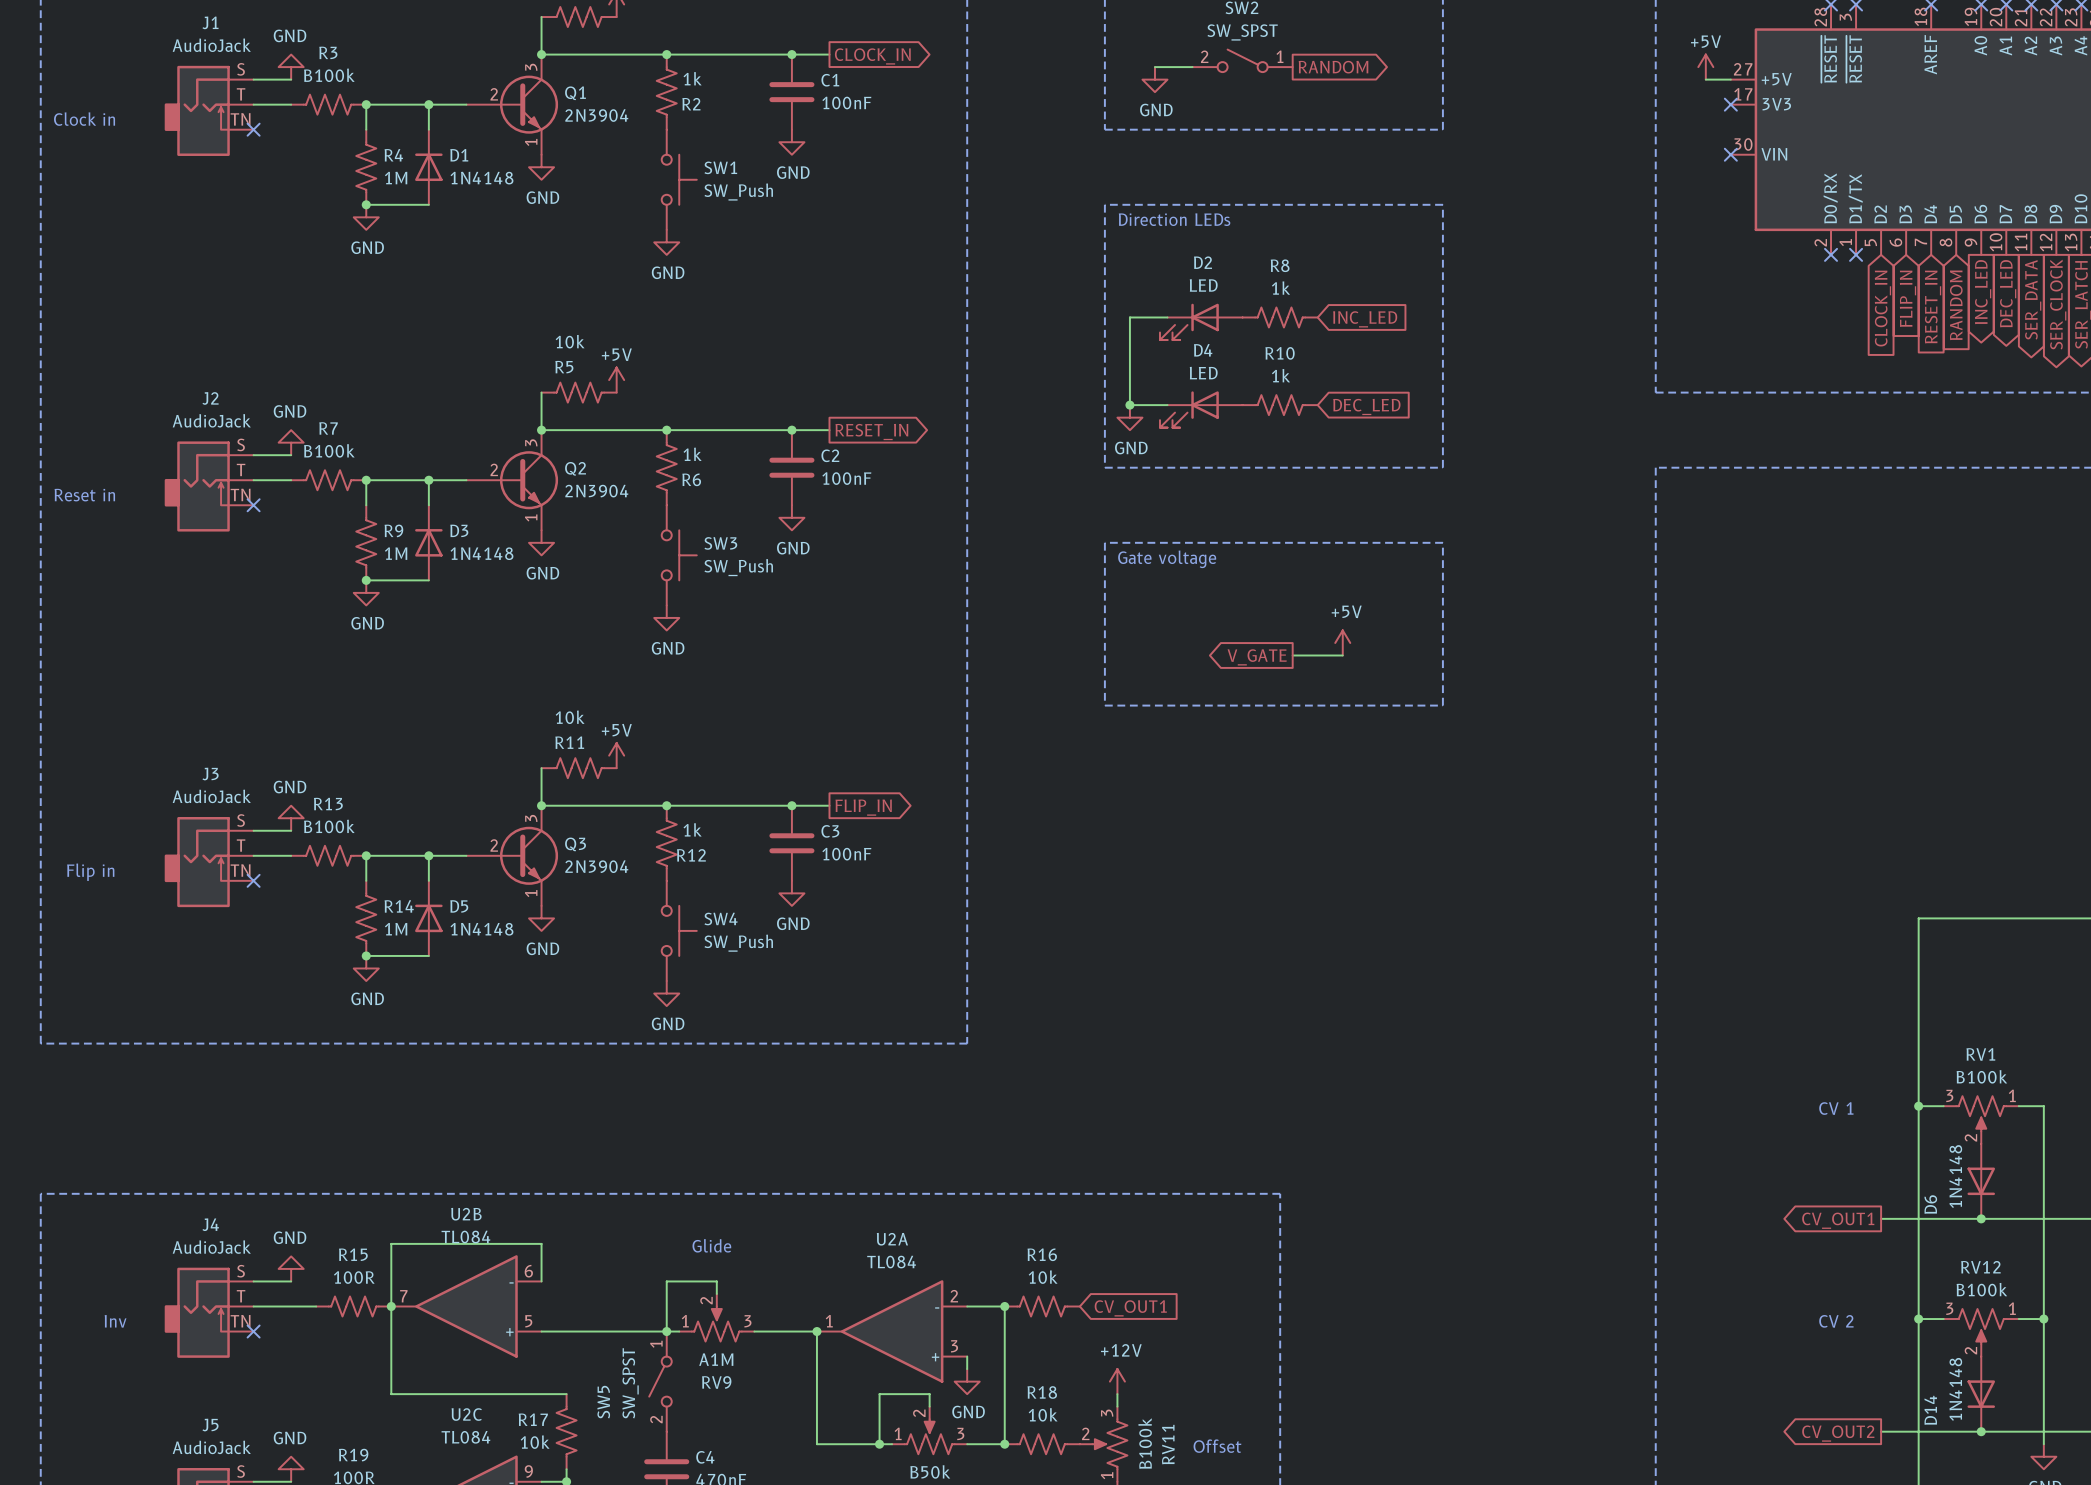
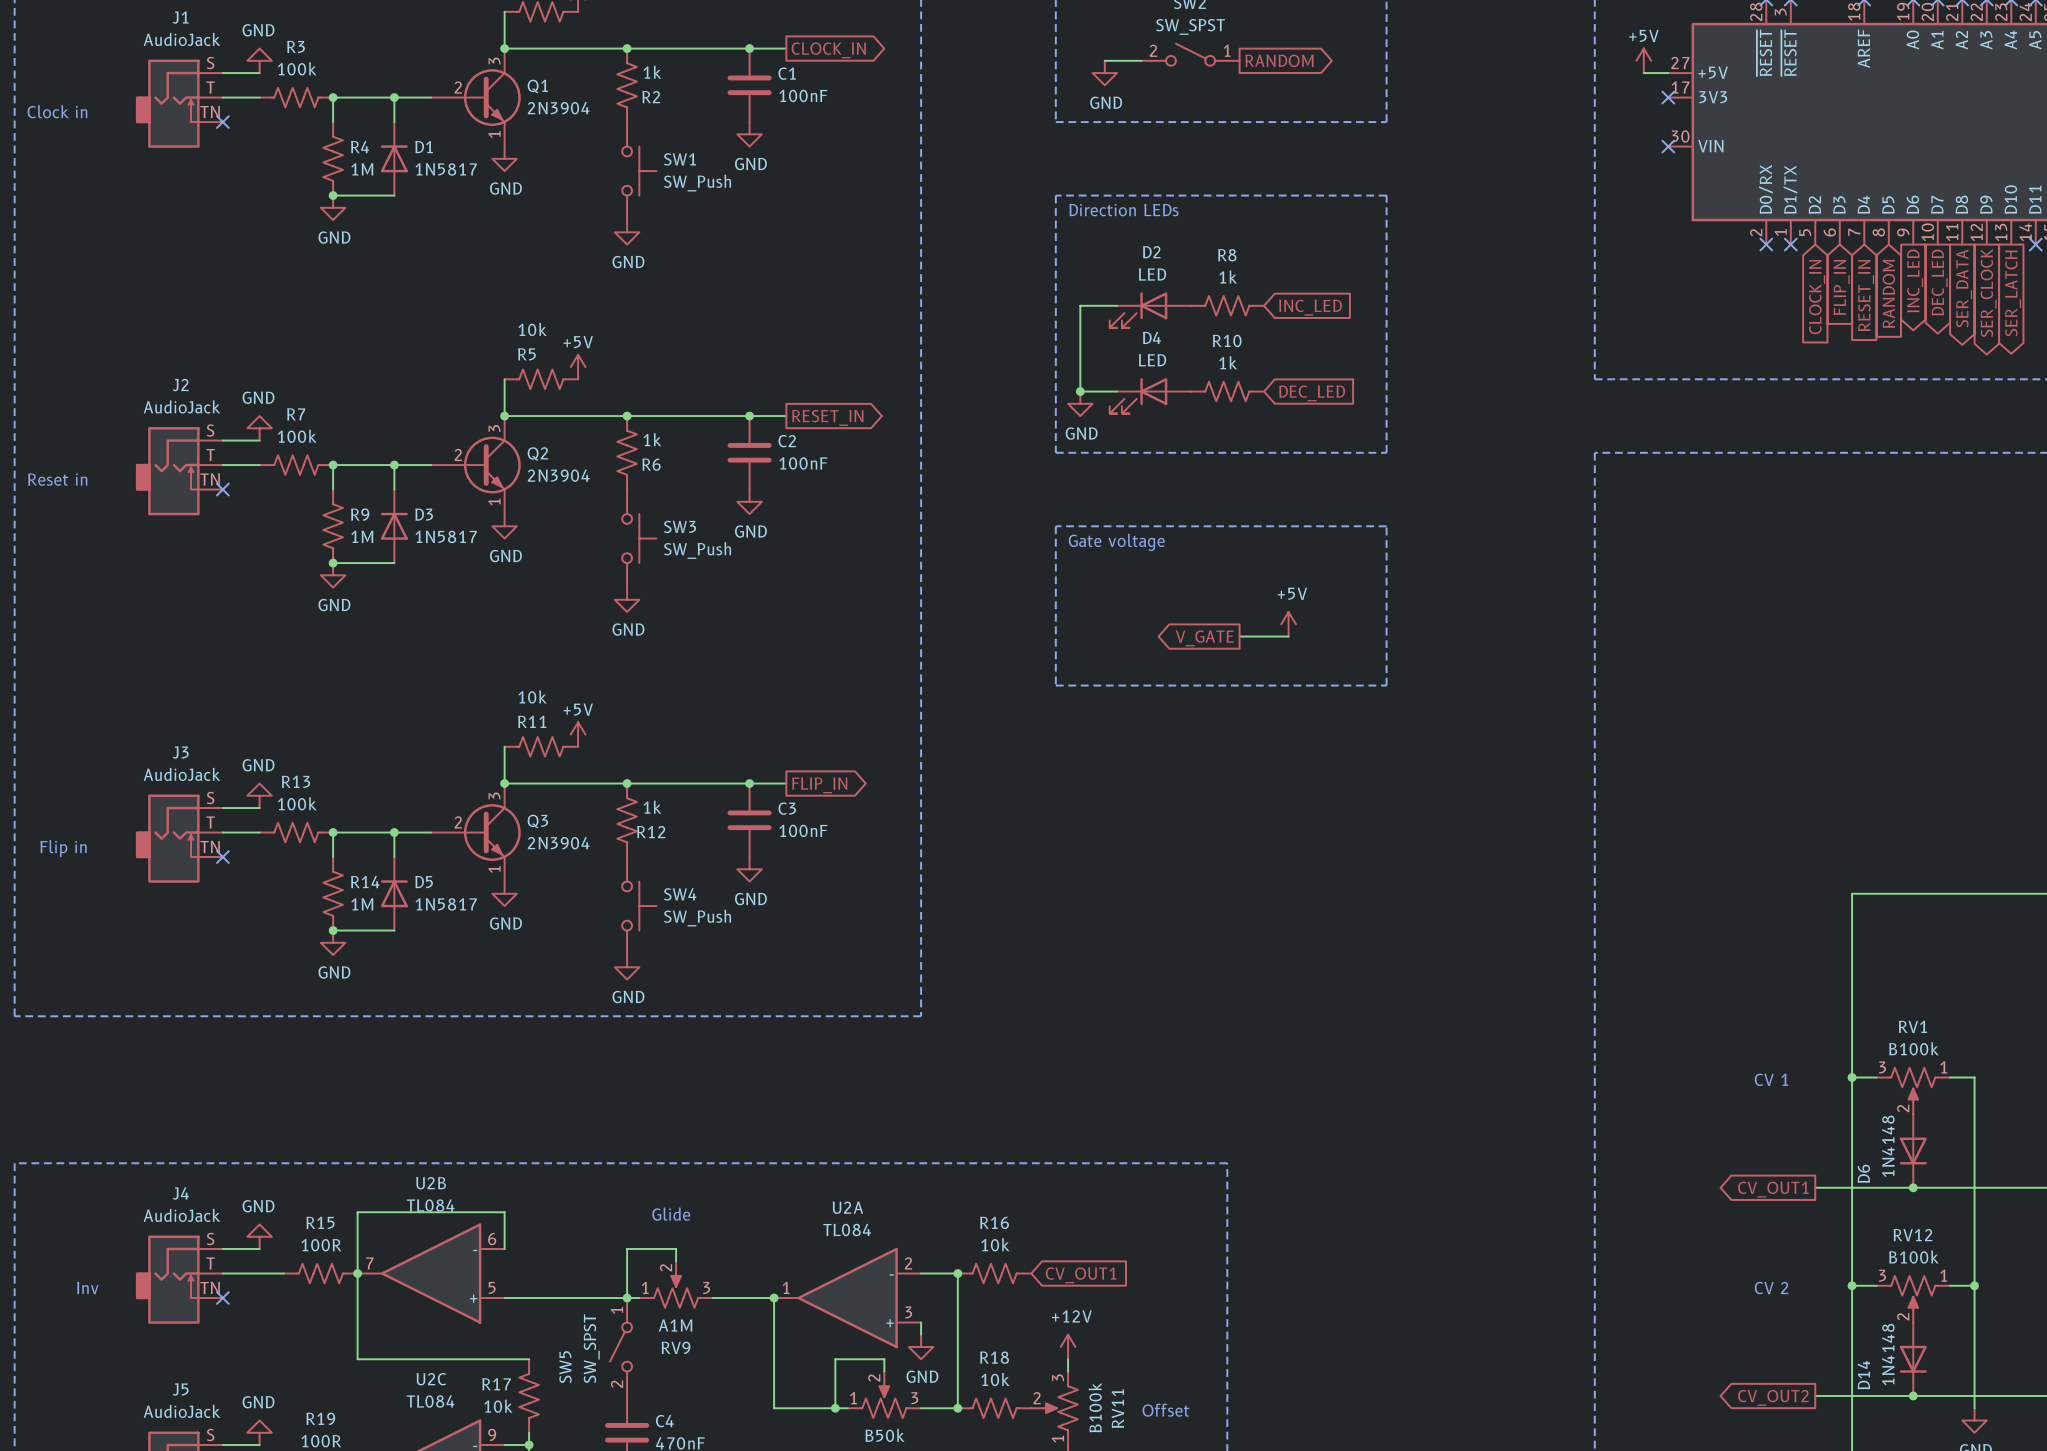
R3 value: B100k (329, 75) -> 100k (297, 68)
D1 value: 1N4148 (481, 178) -> 1N5817 (446, 169)
R7 value: B100k (329, 450) -> 100k (297, 436)
D3 value: 1N4148 (481, 553) -> 1N5817 (446, 536)
R13 value: B100k (329, 826) -> 100k (297, 803)
D5 value: 1N4148 (481, 929) -> 1N5817 (446, 904)

